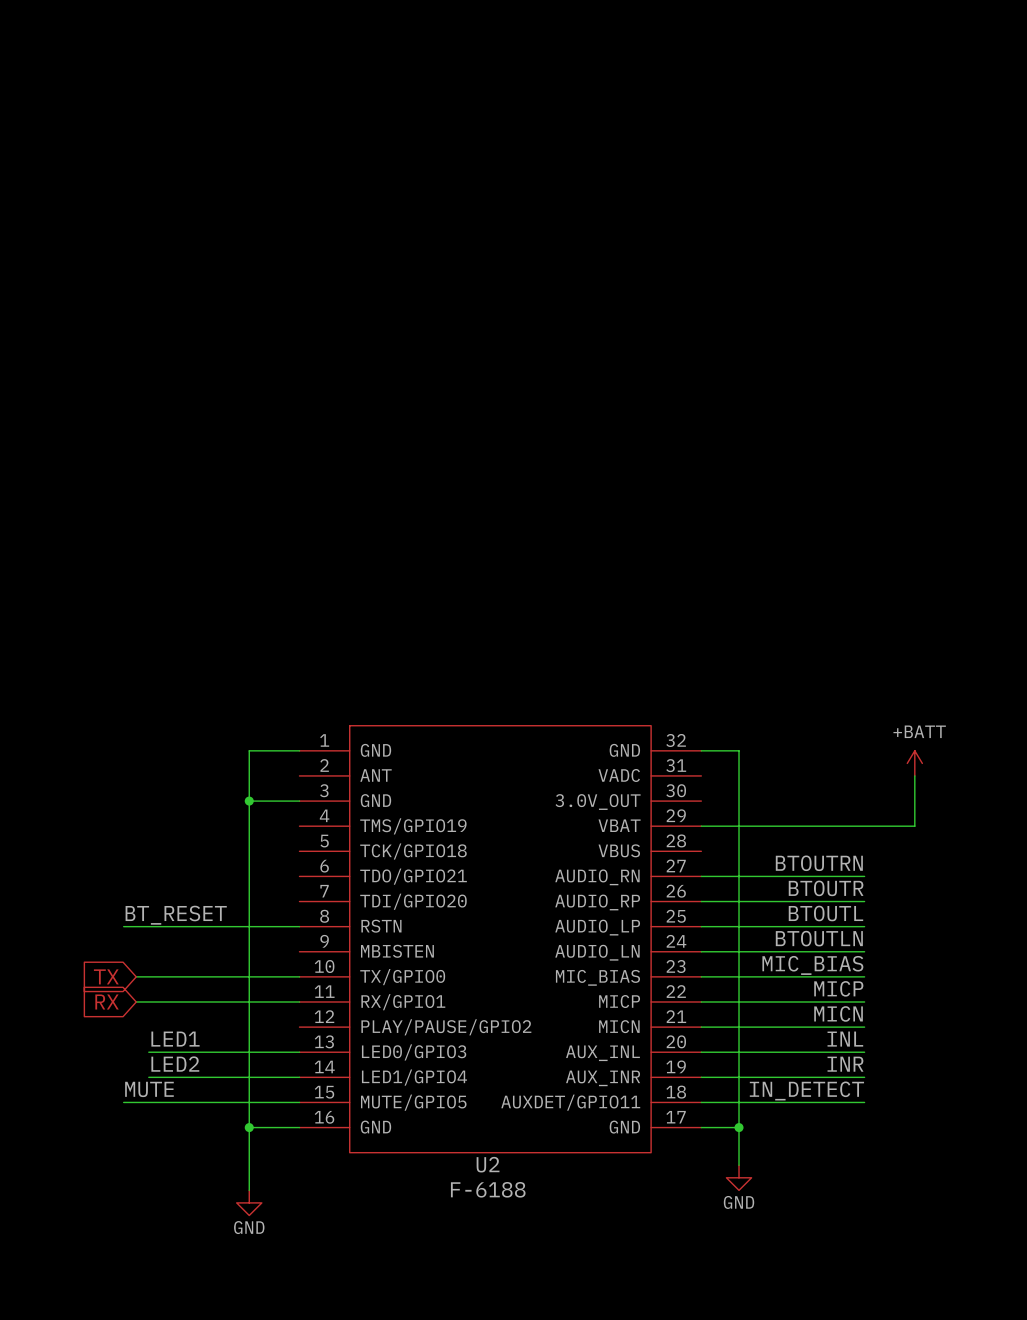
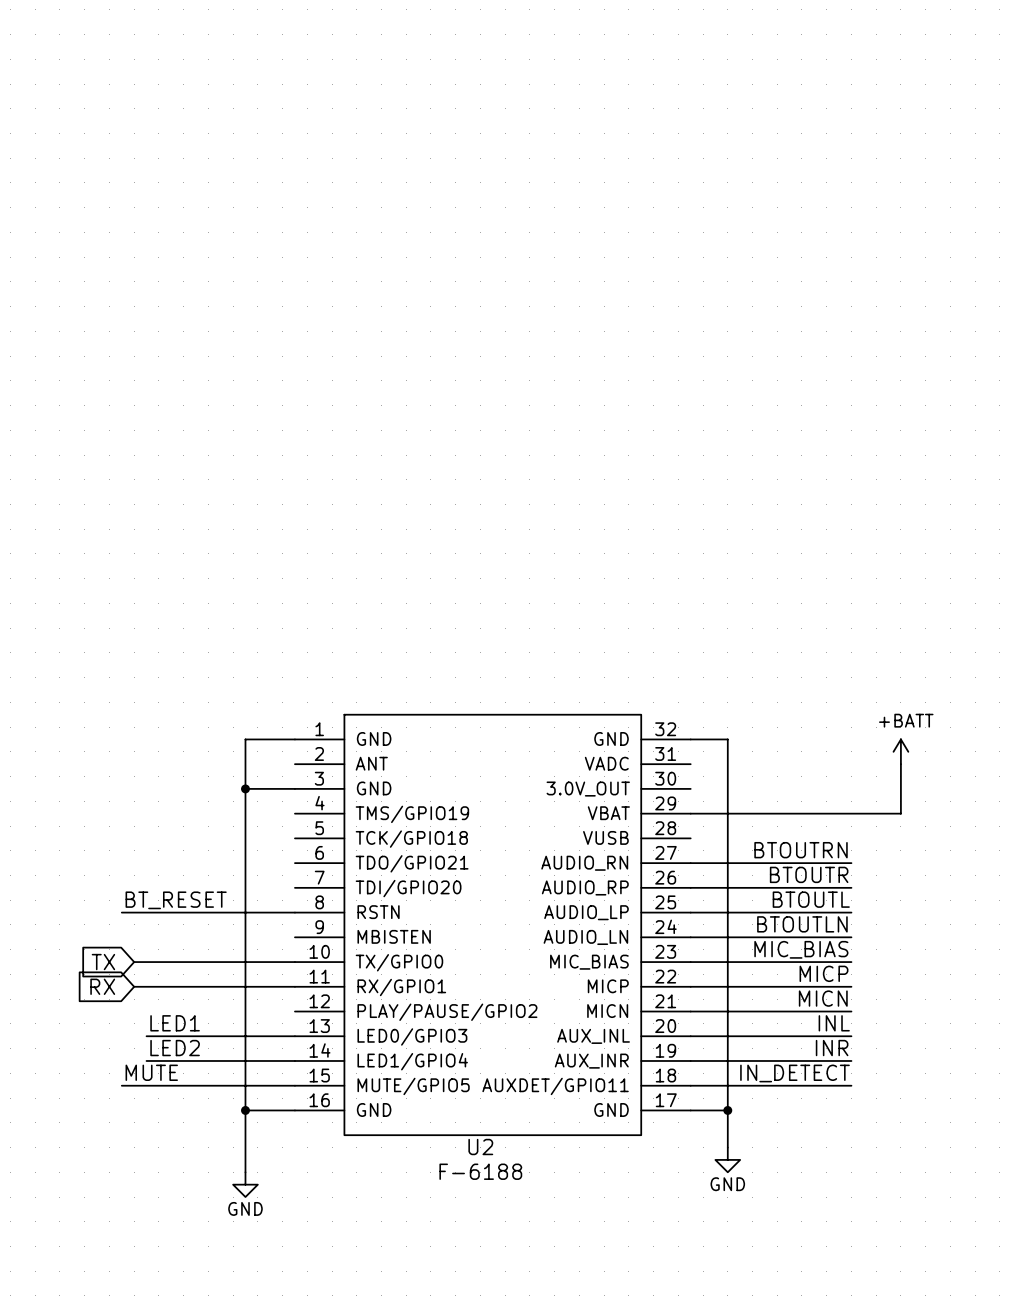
U2 pin name: VBUS (619, 850) -> VUSB (605, 837)

